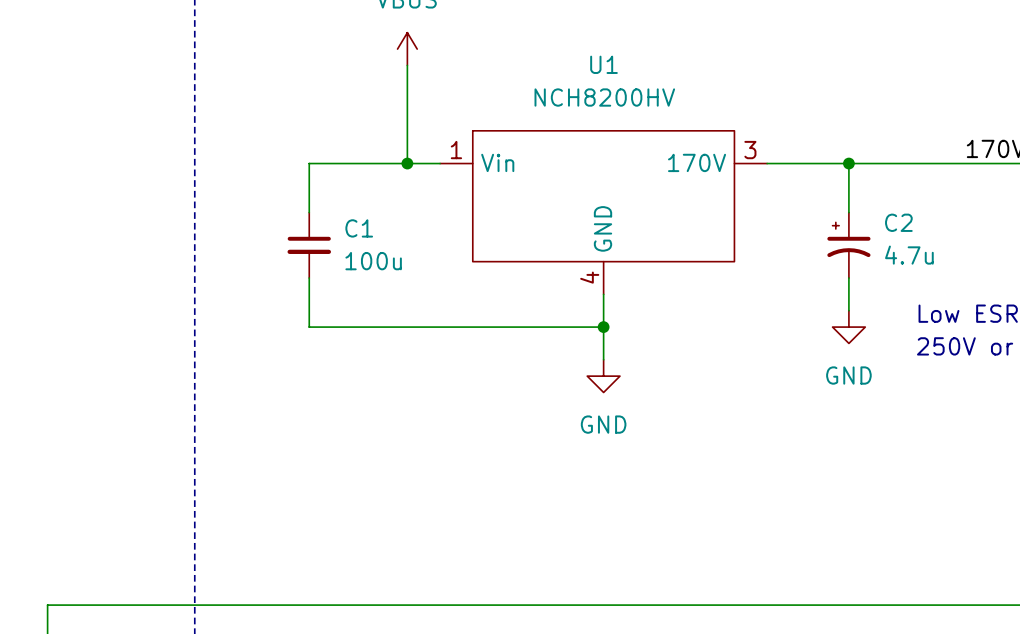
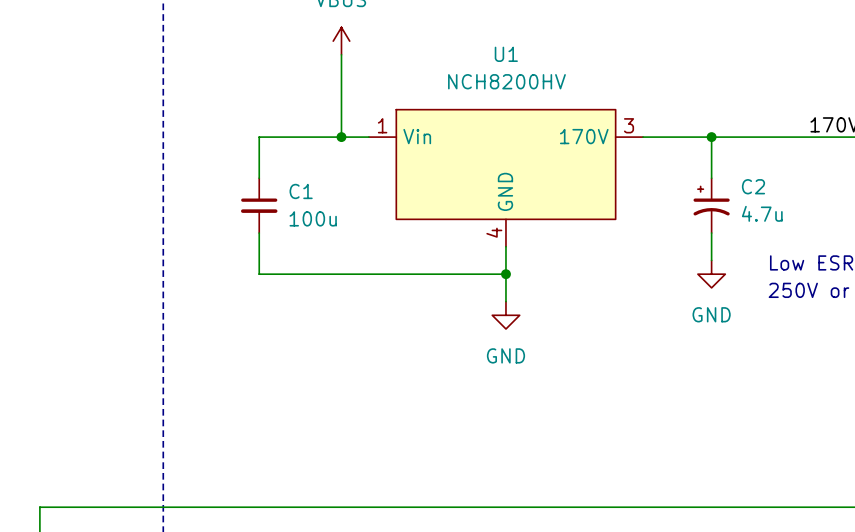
U1 symbol: [440, 130, 768, 295] -> [368, 109, 644, 247]

